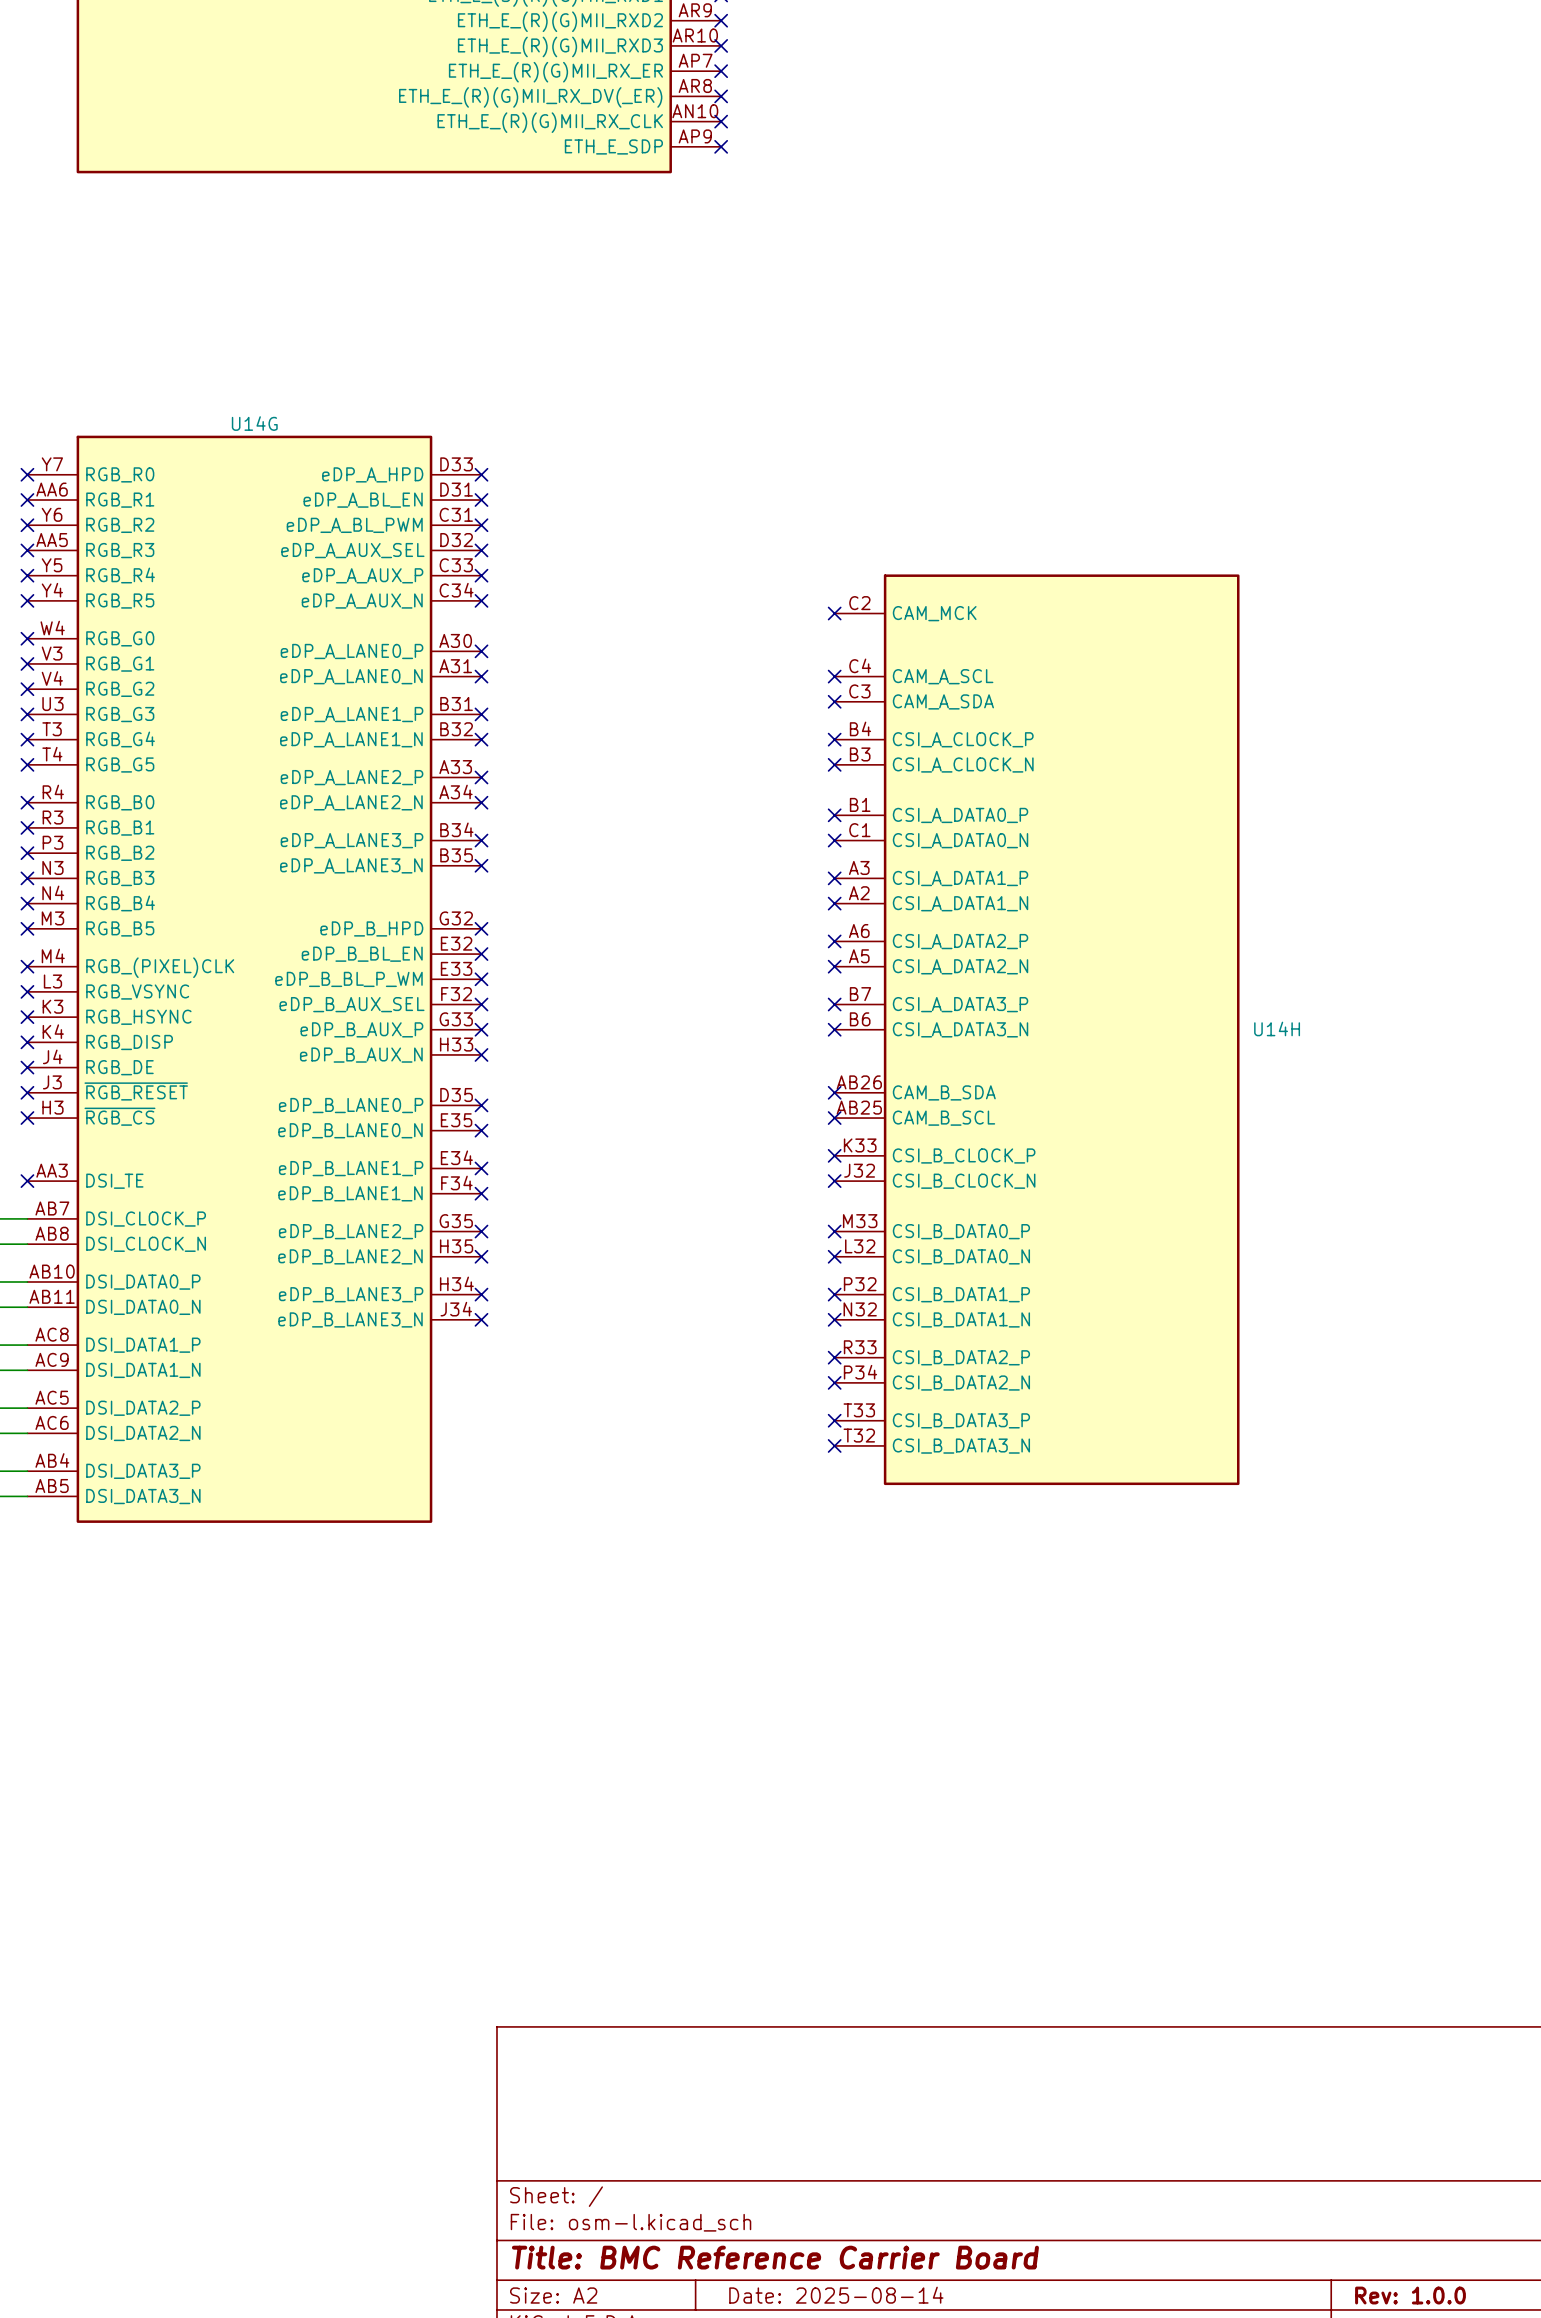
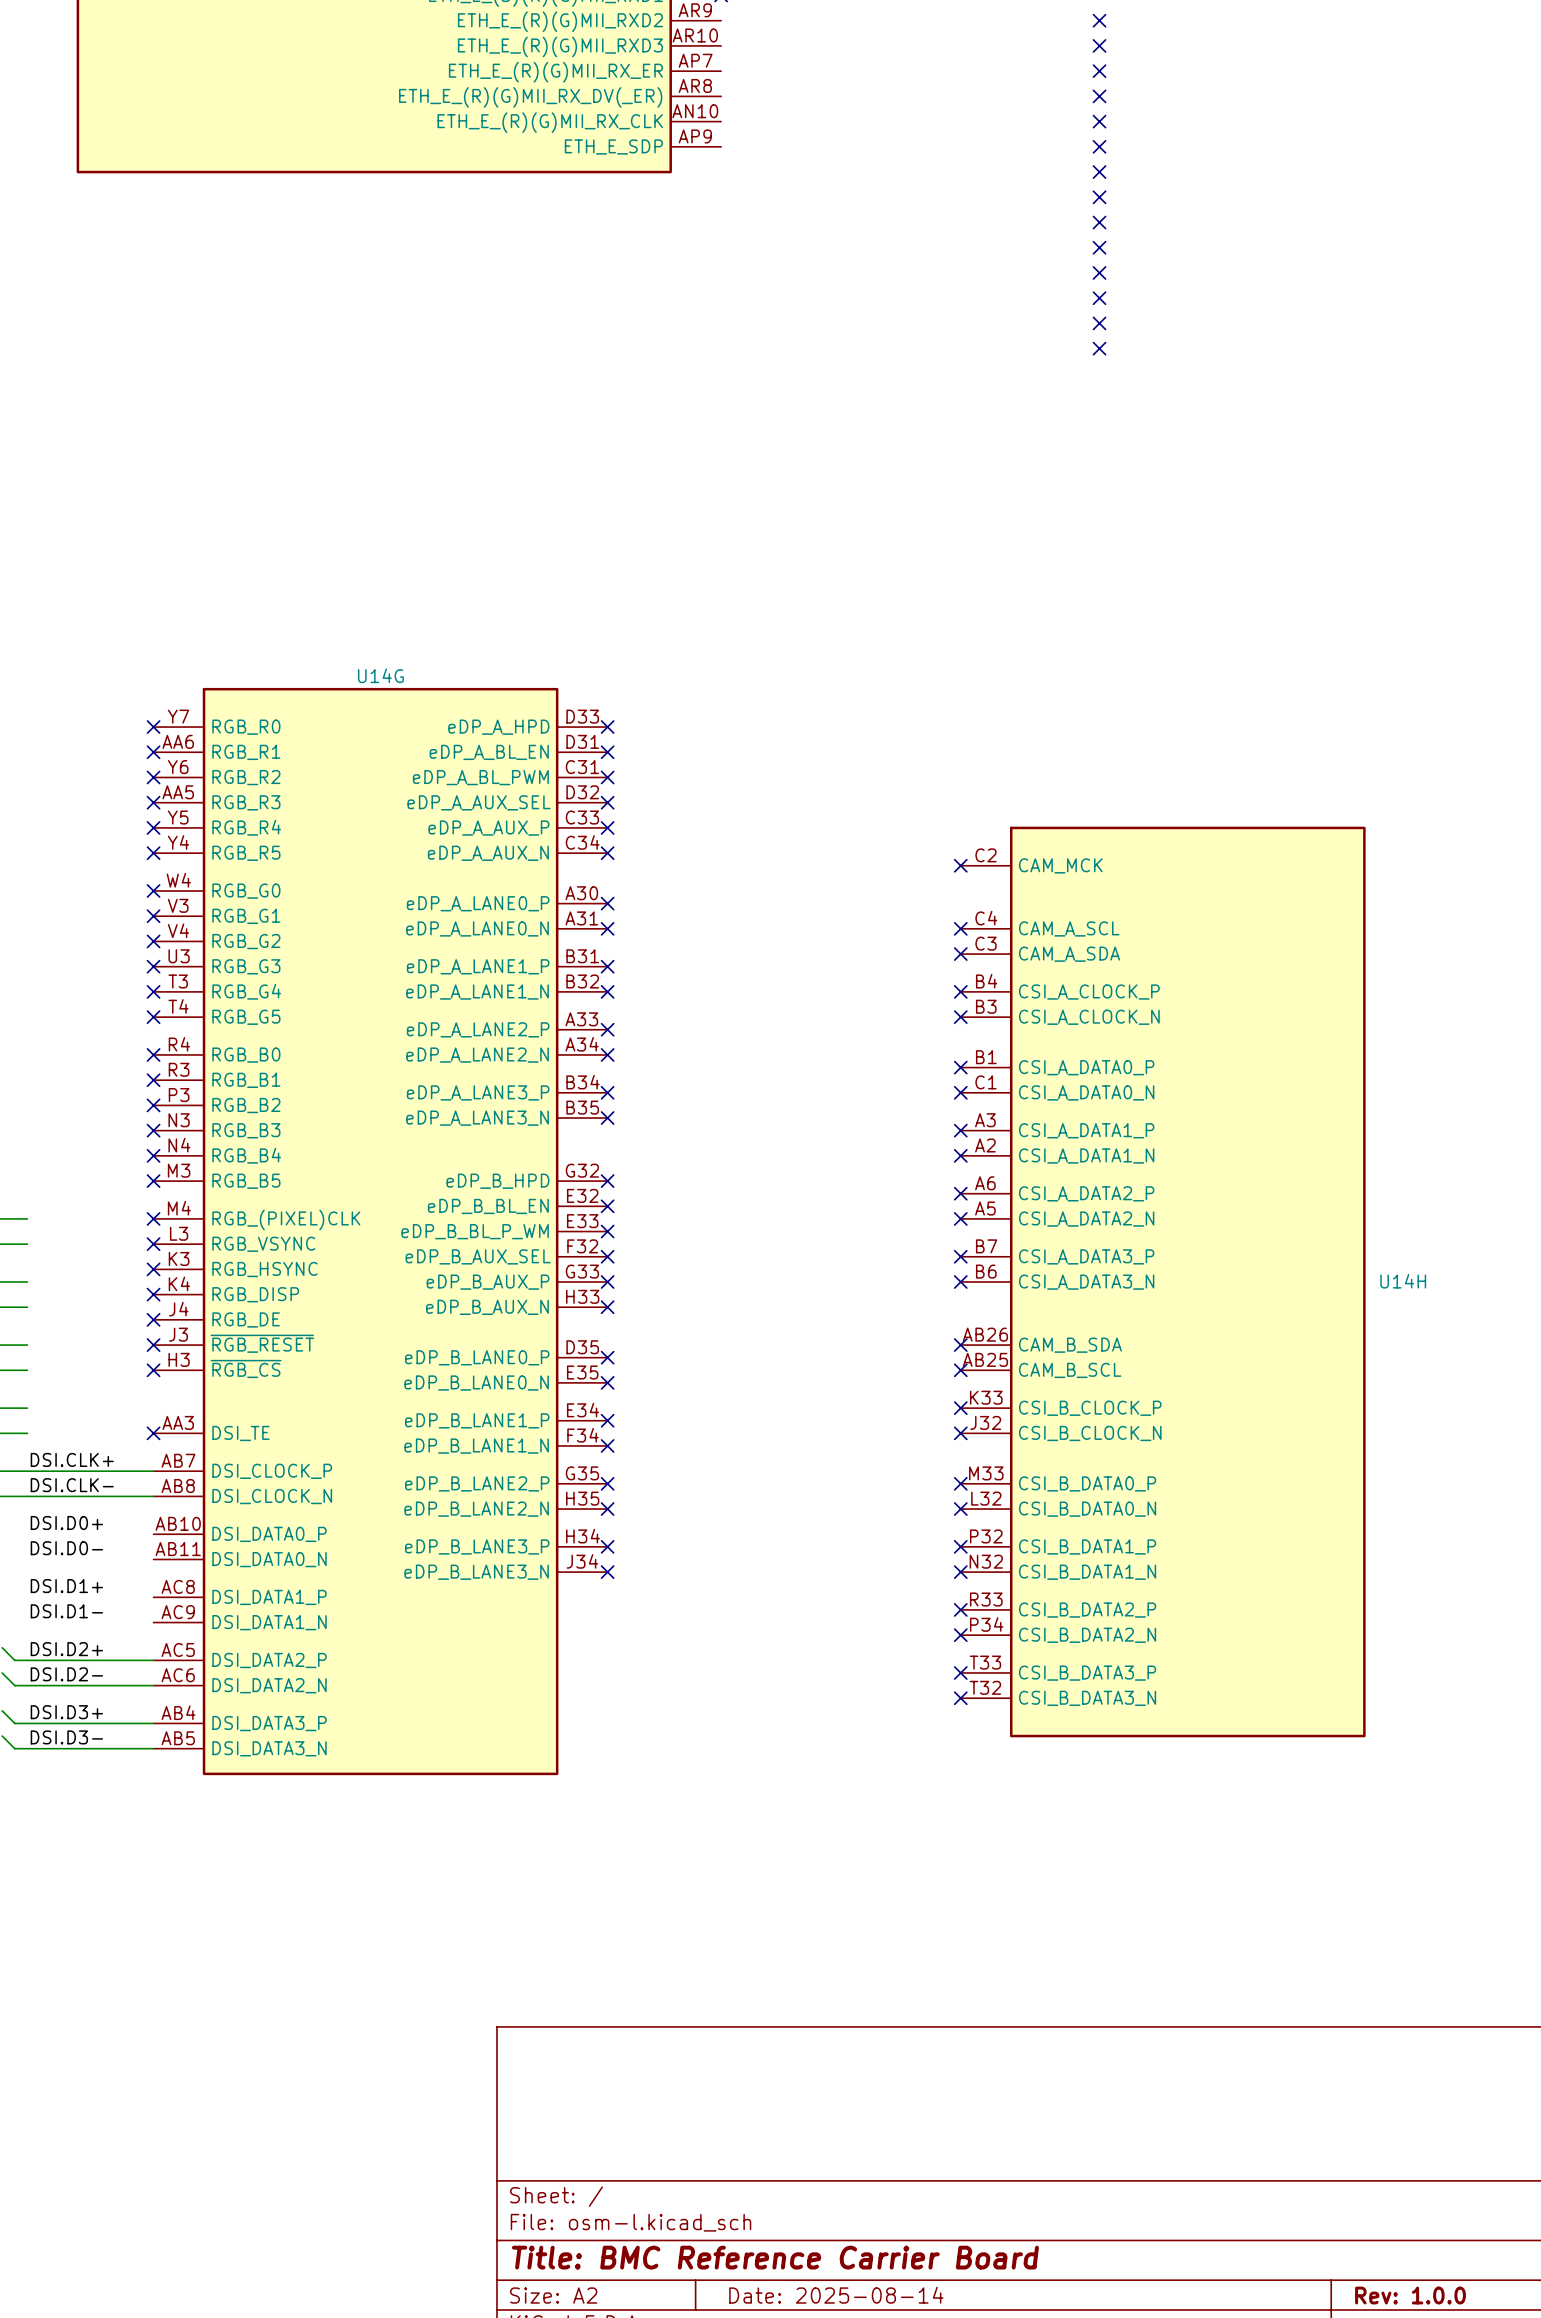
no-connect mark: (721, 20) -> none
no-connect mark: none -> (1099, 20)
no-connect mark: (721, 45) -> none
no-connect mark: none -> (1099, 45)
no-connect mark: (721, 71) -> none
no-connect mark: none -> (1099, 71)
no-connect mark: (721, 96) -> none
no-connect mark: none -> (1099, 96)
no-connect mark: (721, 121) -> none
no-connect mark: none -> (1099, 121)
no-connect mark: (721, 146) -> none
no-connect mark: none -> (1099, 146)
no-connect mark: none -> (1099, 172)
no-connect mark: none -> (1099, 197)
no-connect mark: none -> (1099, 222)
no-connect mark: none -> (1099, 247)
no-connect mark: none -> (1099, 272)
no-connect mark: none -> (1099, 298)
no-connect mark: none -> (1099, 323)
no-connect mark: none -> (1099, 348)
no-connect mark: (27, 474) -> none
no-connect mark: (481, 474) -> none
no-connect mark: (27, 500) -> none
no-connect mark: (481, 500) -> none
no-connect mark: (27, 525) -> none
no-connect mark: (481, 525) -> none
no-connect mark: (27, 550) -> none
no-connect mark: (481, 550) -> none
no-connect mark: (27, 575) -> none
no-connect mark: (481, 575) -> none
no-connect mark: (27, 600) -> none
no-connect mark: (481, 600) -> none
no-connect mark: (834, 613) -> none
no-connect mark: (27, 638) -> none
no-connect mark: (481, 651) -> none
no-connect mark: (27, 663) -> none
no-connect mark: (481, 676) -> none
no-connect mark: (834, 676) -> none
no-connect mark: (27, 689) -> none
no-connect mark: (834, 701) -> none
no-connect mark: (27, 714) -> none
no-connect mark: (481, 714) -> none
no-connect mark: none -> (153, 727)
no-connect mark: none -> (607, 727)
no-connect mark: (27, 739) -> none
no-connect mark: (481, 739) -> none
no-connect mark: (834, 739) -> none
no-connect mark: none -> (153, 752)
no-connect mark: none -> (607, 752)
no-connect mark: (27, 764) -> none
no-connect mark: (834, 764) -> none
no-connect mark: none -> (153, 777)
no-connect mark: (481, 777) -> none
no-connect mark: none -> (607, 777)
no-connect mark: (27, 802) -> none
no-connect mark: none -> (153, 802)
no-connect mark: (481, 802) -> none
no-connect mark: none -> (607, 802)
no-connect mark: (834, 815) -> none
no-connect mark: (27, 827) -> none
no-connect mark: none -> (153, 827)
no-connect mark: none -> (607, 827)
no-connect mark: (481, 840) -> none
no-connect mark: (834, 840) -> none
no-connect mark: (27, 853) -> none
no-connect mark: none -> (153, 853)
no-connect mark: none -> (607, 853)
no-connect mark: (481, 865) -> none
no-connect mark: none -> (960, 865)
no-connect mark: (27, 878) -> none
no-connect mark: (834, 878) -> none
no-connect mark: none -> (153, 891)
no-connect mark: (27, 903) -> none
no-connect mark: none -> (607, 903)
no-connect mark: (834, 903) -> none
no-connect mark: none -> (153, 916)
no-connect mark: (27, 928) -> none
no-connect mark: (481, 928) -> none
no-connect mark: none -> (607, 928)
no-connect mark: none -> (960, 928)
no-connect mark: none -> (153, 941)
no-connect mark: (834, 941) -> none
no-connect mark: (481, 954) -> none
no-connect mark: none -> (960, 954)
no-connect mark: (27, 966) -> none
no-connect mark: none -> (153, 966)
no-connect mark: none -> (607, 966)
no-connect mark: (834, 966) -> none
U14G position: (254, 979) -> (380, 1231)
no-connect mark: (481, 979) -> none
no-connect mark: (27, 991) -> none
no-connect mark: none -> (153, 991)
no-connect mark: none -> (607, 991)
no-connect mark: none -> (960, 991)
no-connect mark: (481, 1004) -> none
no-connect mark: (834, 1004) -> none
no-connect mark: (27, 1017) -> none
no-connect mark: none -> (153, 1017)
no-connect mark: none -> (960, 1017)
no-connect mark: (481, 1029) -> none
no-connect mark: none -> (607, 1029)
no-connect mark: (834, 1029) -> none
U14H position: (1037, 1029) -> (1163, 1281)
no-connect mark: (27, 1042) -> none
no-connect mark: none -> (153, 1054)
no-connect mark: (481, 1054) -> none
no-connect mark: none -> (607, 1054)
no-connect mark: (27, 1067) -> none
no-connect mark: none -> (960, 1067)
no-connect mark: none -> (153, 1080)
no-connect mark: (27, 1092) -> none
no-connect mark: none -> (607, 1092)
no-connect mark: (834, 1092) -> none
no-connect mark: none -> (960, 1092)
no-connect mark: none -> (153, 1105)
no-connect mark: (481, 1105) -> none
no-connect mark: (27, 1118) -> none
no-connect mark: none -> (607, 1118)
no-connect mark: (834, 1118) -> none
no-connect mark: none -> (153, 1130)
no-connect mark: (481, 1130) -> none
no-connect mark: none -> (960, 1130)
no-connect mark: none -> (153, 1155)
no-connect mark: (834, 1155) -> none
no-connect mark: none -> (960, 1155)
no-connect mark: (481, 1168) -> none
no-connect mark: (27, 1181) -> none
no-connect mark: none -> (153, 1181)
no-connect mark: none -> (607, 1181)
no-connect mark: (834, 1181) -> none
no-connect mark: (481, 1193) -> none
no-connect mark: none -> (960, 1193)
no-connect mark: none -> (607, 1206)
no-connect mark: none -> (153, 1218)
no-connect mark: none -> (960, 1218)
no-connect mark: (481, 1231) -> none
no-connect mark: none -> (607, 1231)
no-connect mark: (834, 1231) -> none
no-connect mark: none -> (153, 1244)
no-connect mark: (481, 1256) -> none
no-connect mark: none -> (607, 1256)
no-connect mark: (834, 1256) -> none
no-connect mark: none -> (960, 1256)
no-connect mark: none -> (153, 1269)
no-connect mark: none -> (607, 1281)
no-connect mark: none -> (960, 1281)
no-connect mark: none -> (153, 1294)
no-connect mark: (481, 1294) -> none
no-connect mark: (834, 1294) -> none
no-connect mark: none -> (607, 1307)
no-connect mark: none -> (153, 1319)
no-connect mark: (481, 1319) -> none
no-connect mark: (834, 1319) -> none
no-connect mark: none -> (153, 1345)
no-connect mark: none -> (960, 1345)
no-connect mark: none -> (607, 1357)
no-connect mark: (834, 1357) -> none
no-connect mark: none -> (153, 1370)
no-connect mark: none -> (960, 1370)
no-connect mark: none -> (607, 1382)
no-connect mark: (834, 1382) -> none
no-connect mark: none -> (960, 1408)
no-connect mark: none -> (607, 1420)
no-connect mark: (834, 1420) -> none
no-connect mark: none -> (153, 1433)
no-connect mark: none -> (960, 1433)
no-connect mark: none -> (607, 1445)
no-connect mark: (834, 1445) -> none
label: none -> DSI.CLK+ (72, 1459)
no-connect mark: none -> (607, 1483)
no-connect mark: none -> (960, 1483)
label: none -> DSI.CLK- (72, 1485)
no-connect mark: none -> (607, 1509)
no-connect mark: none -> (960, 1509)
label: none -> DSI.D0+ (66, 1522)
no-connect mark: none -> (607, 1546)
no-connect mark: none -> (960, 1546)
label: none -> DSI.D0- (66, 1548)
no-connect mark: none -> (607, 1572)
no-connect mark: none -> (960, 1572)
label: none -> DSI.D1+ (66, 1586)
no-connect mark: none -> (960, 1609)
label: none -> DSI.D1- (66, 1611)
no-connect mark: none -> (960, 1635)
wire: none -> (2, 1647) (14, 1660) (153, 1660)
label: none -> DSI.D2+ (66, 1649)
wire: none -> (2, 1672) (14, 1685) (153, 1685)
no-connect mark: none -> (960, 1672)
label: none -> DSI.D2- (66, 1674)
no-connect mark: none -> (960, 1698)
wire: none -> (2, 1710) (14, 1723) (153, 1723)
label: none -> DSI.D3+ (66, 1712)
wire: none -> (2, 1736) (14, 1748) (153, 1748)
label: none -> DSI.D3- (66, 1737)

